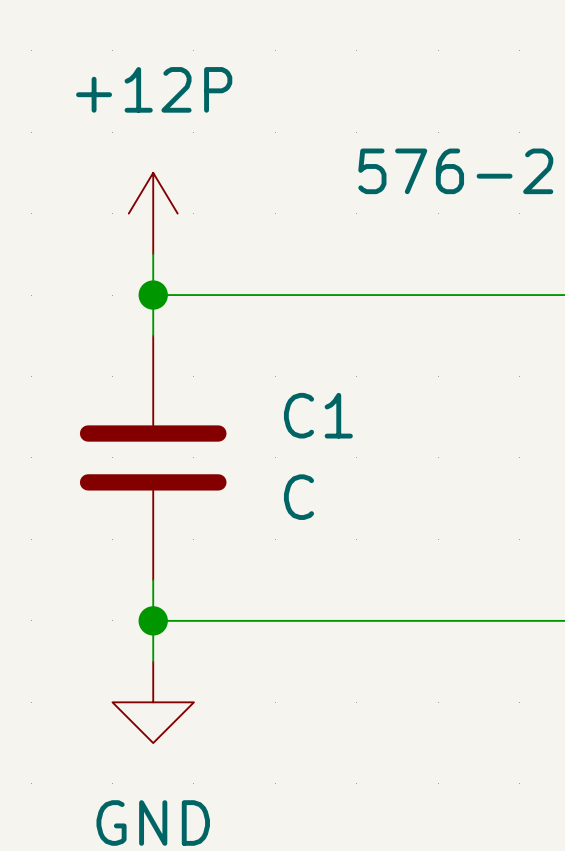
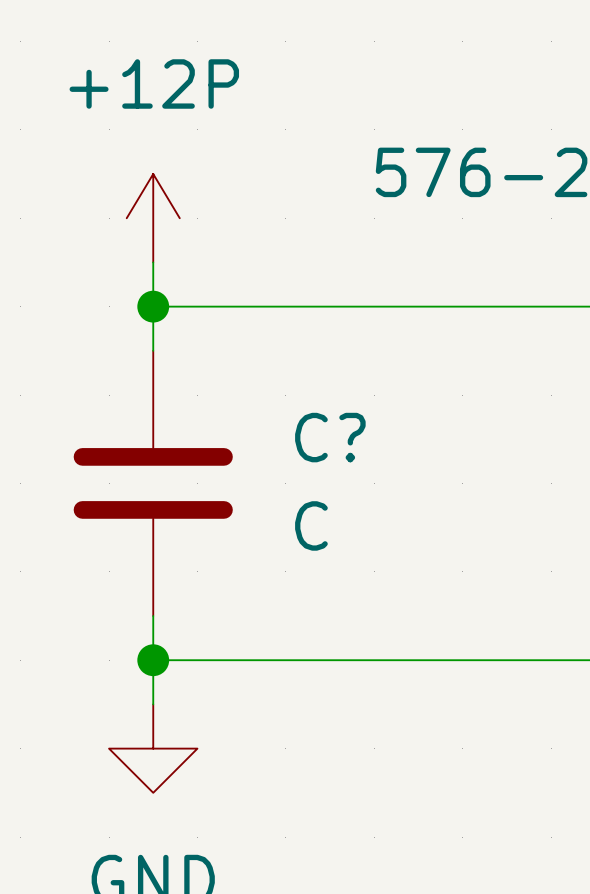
C1 name: C1 (318, 415) -> C? (330, 437)

